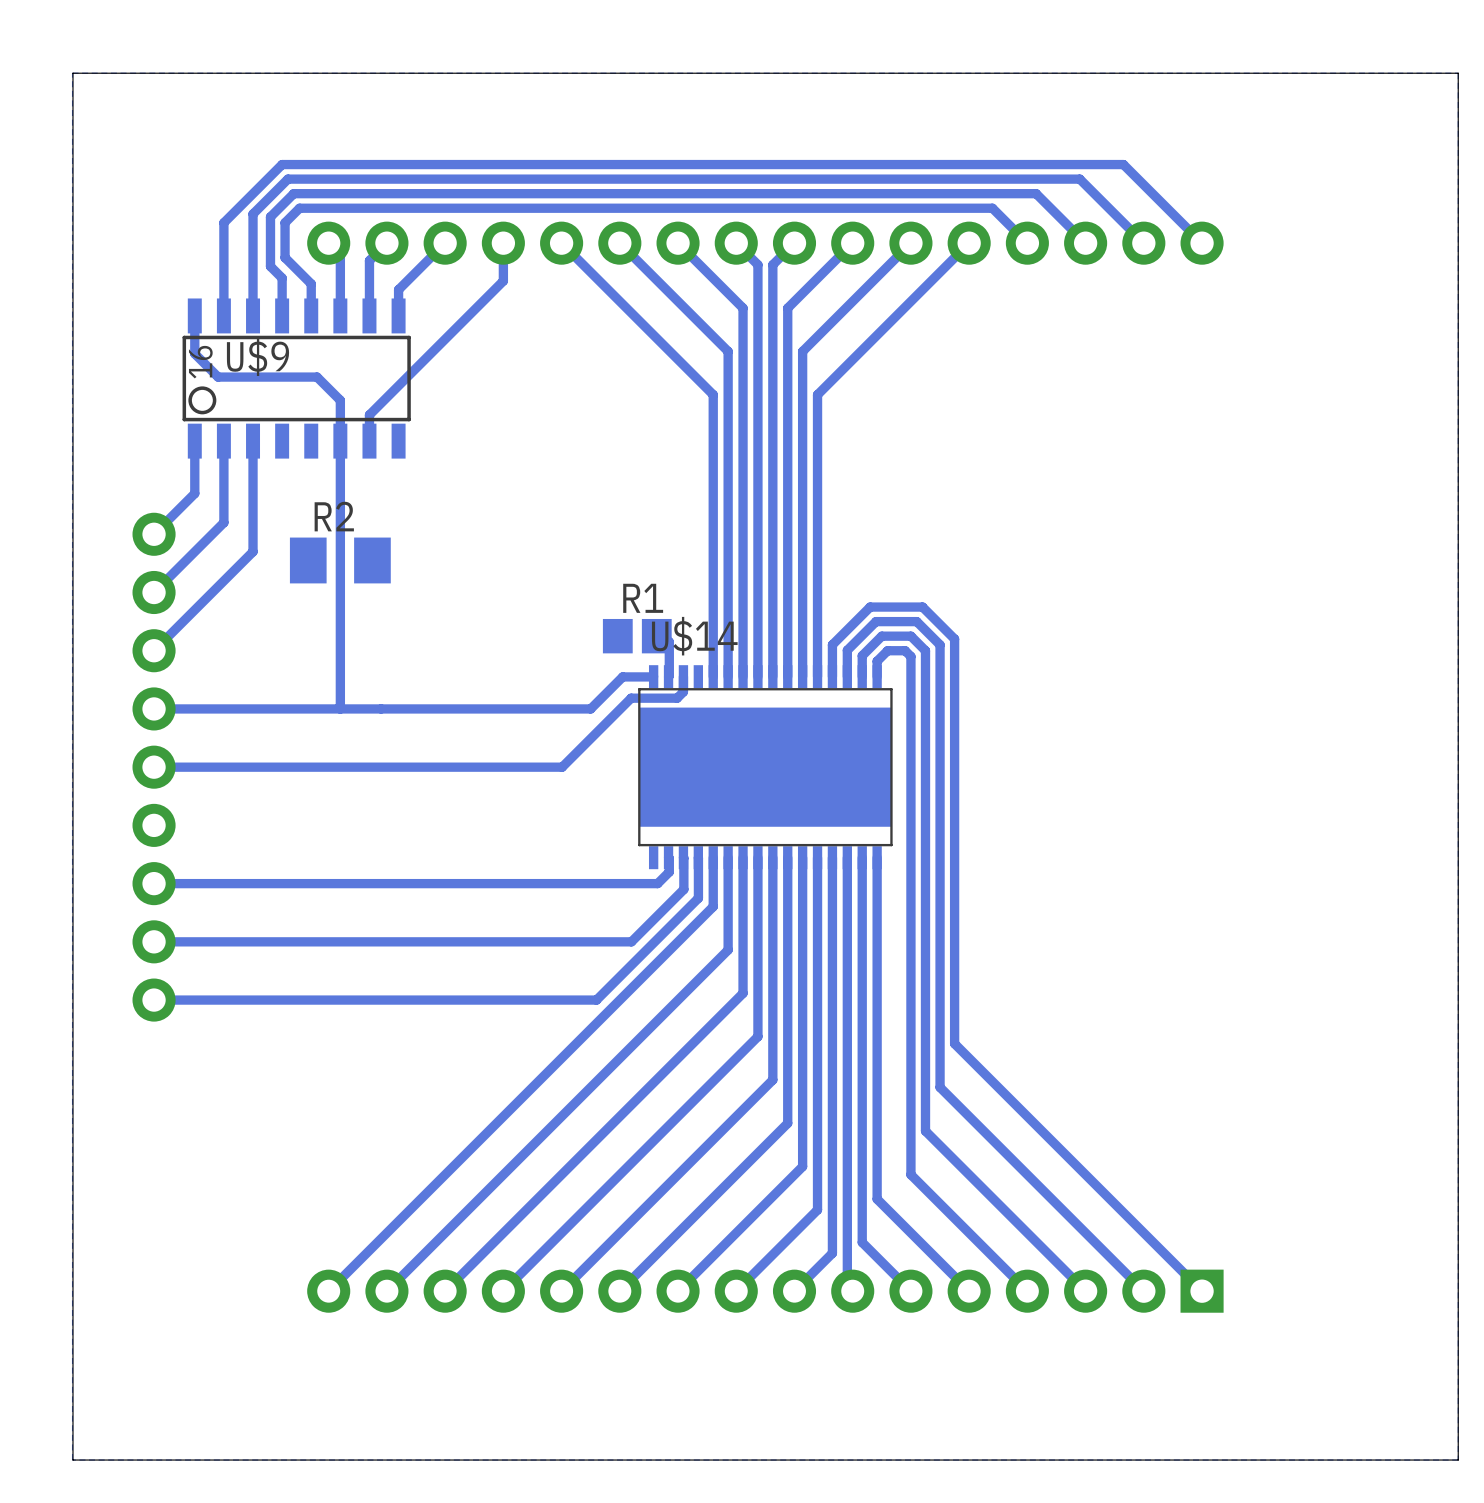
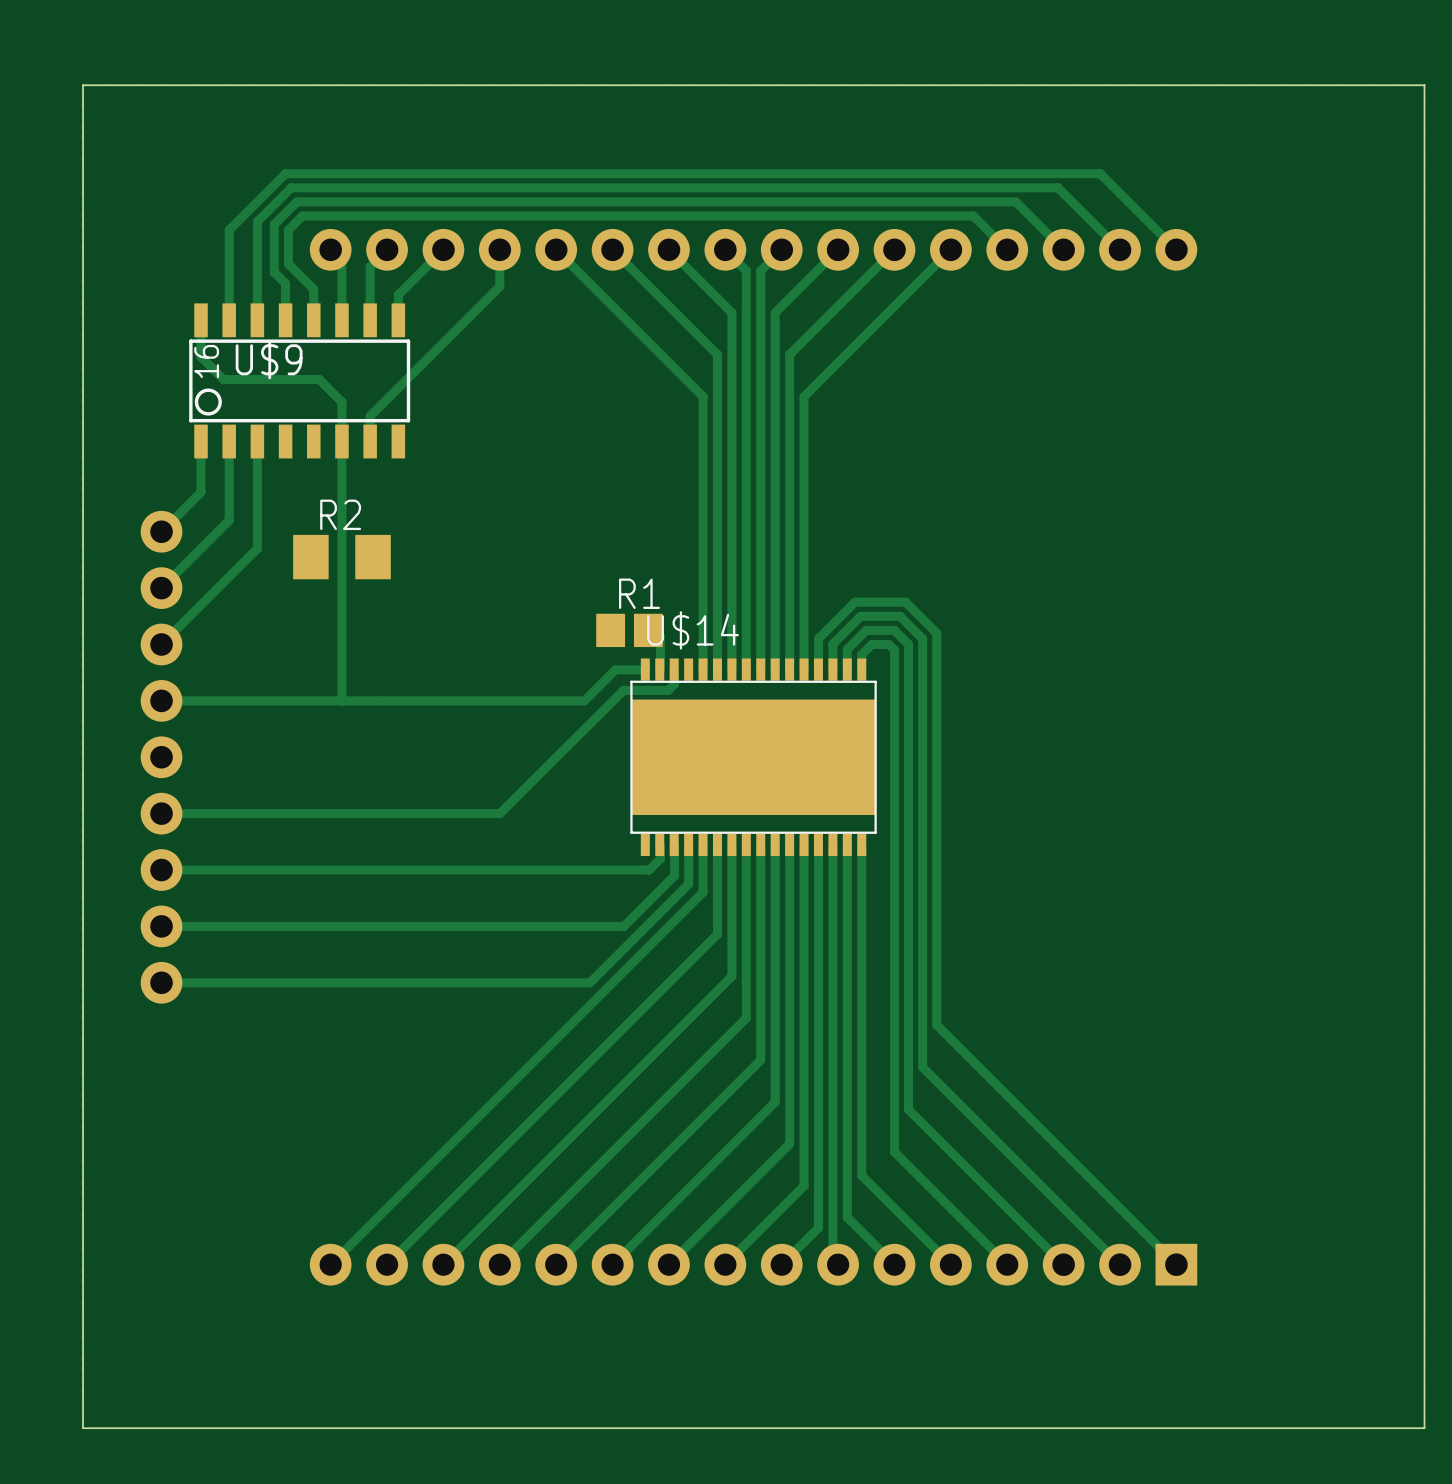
track: (631, 698) (562, 767) (154, 767) -> (623, 690) (499, 813) (161, 813)

